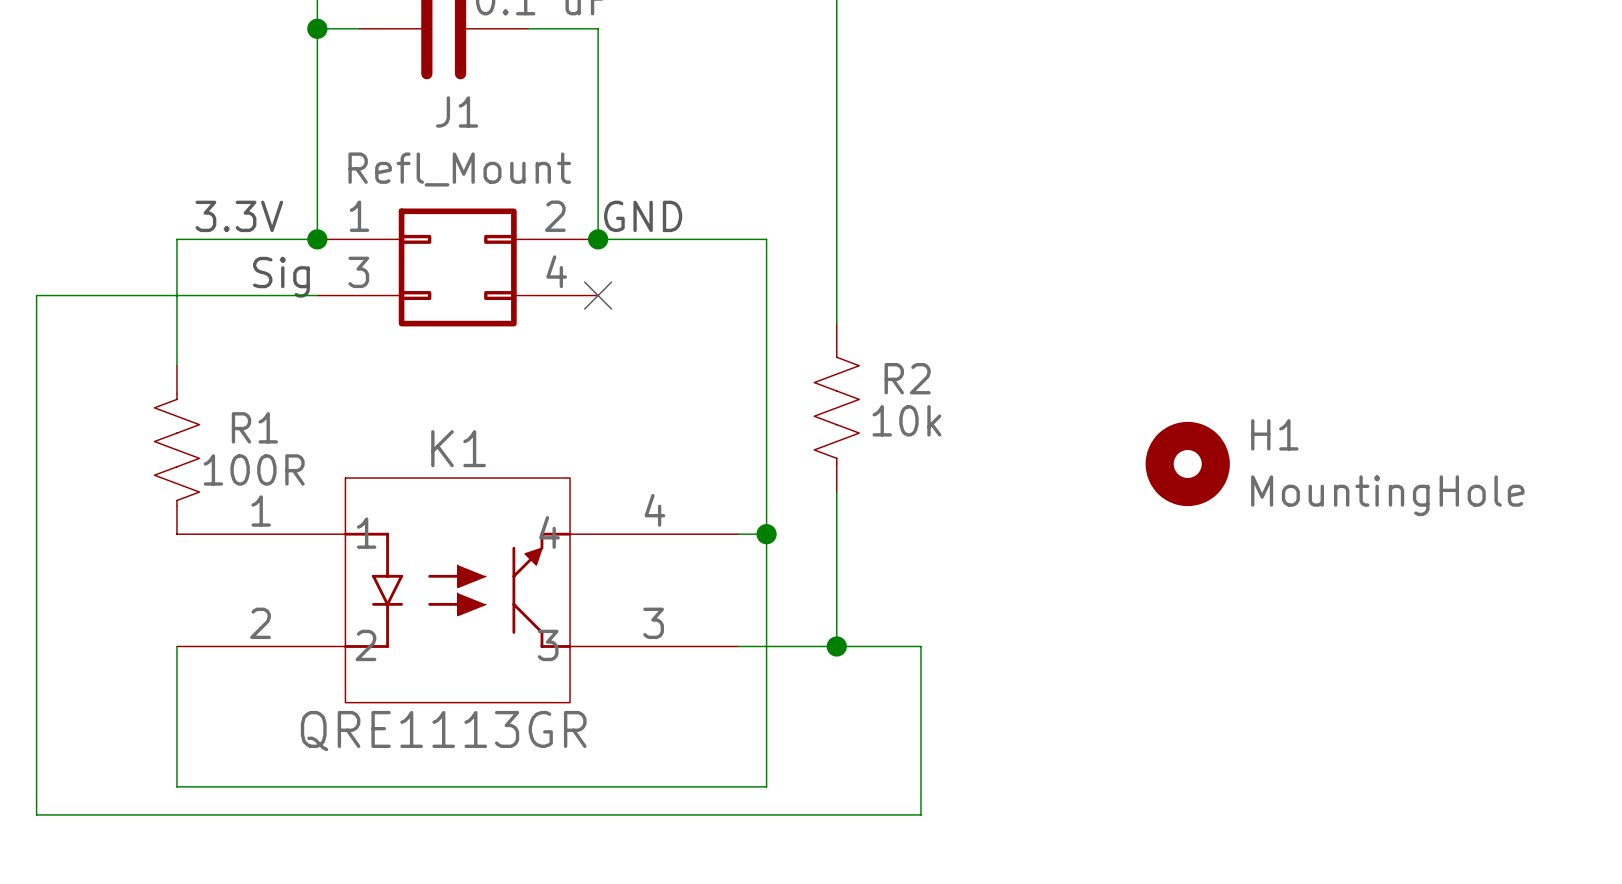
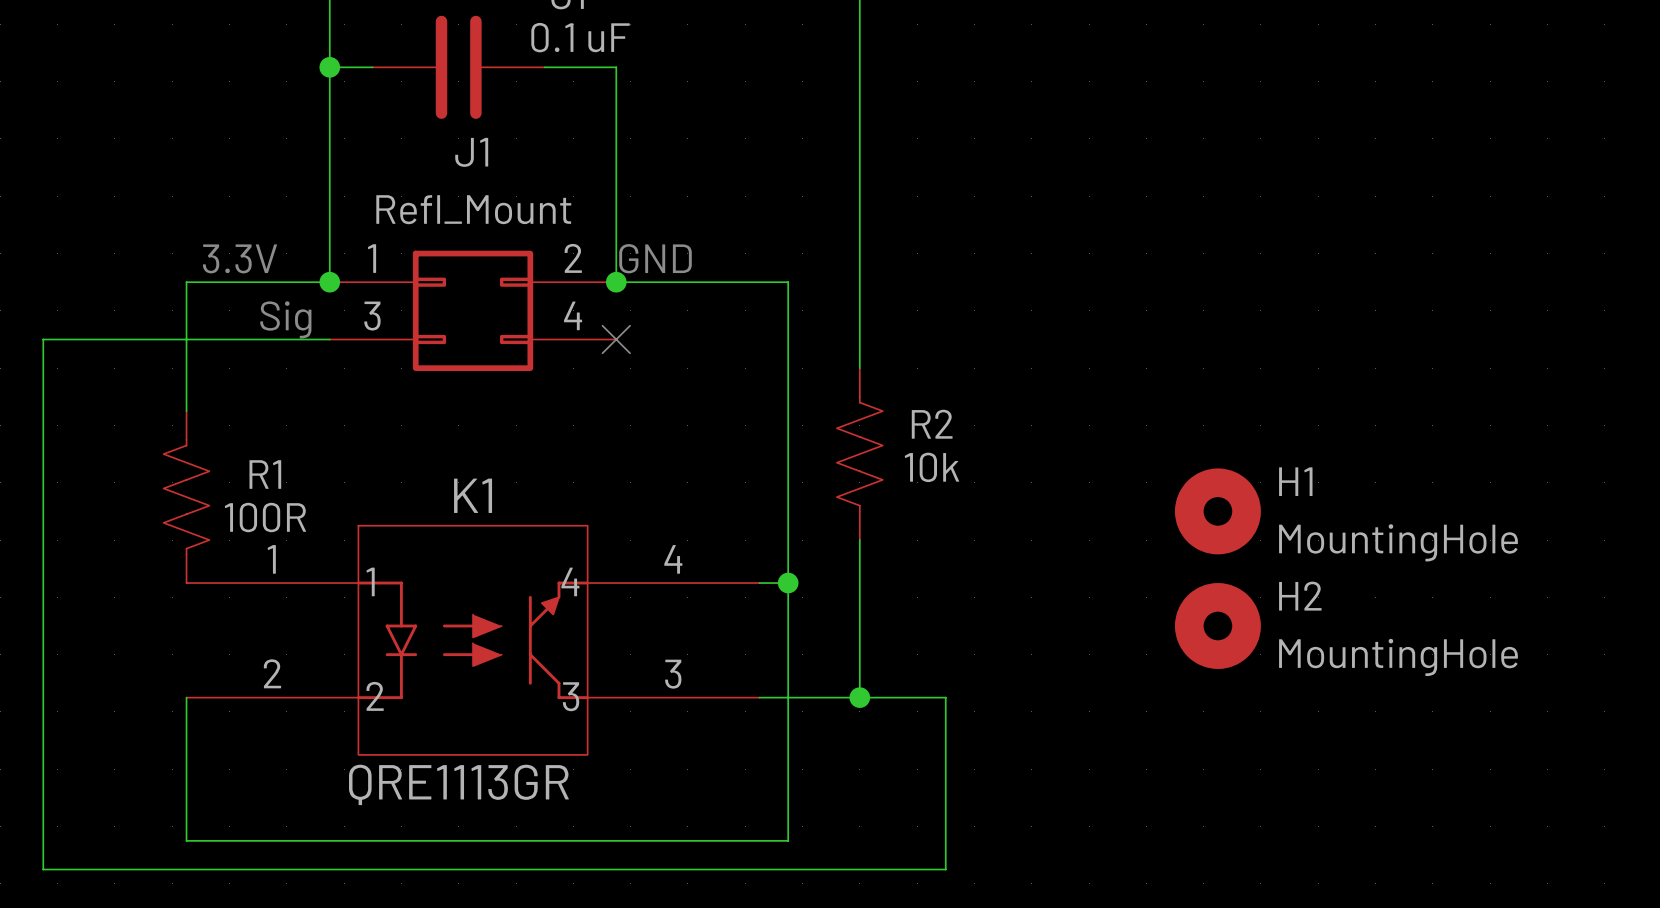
H2: none -> MountingHole (1217, 626)

